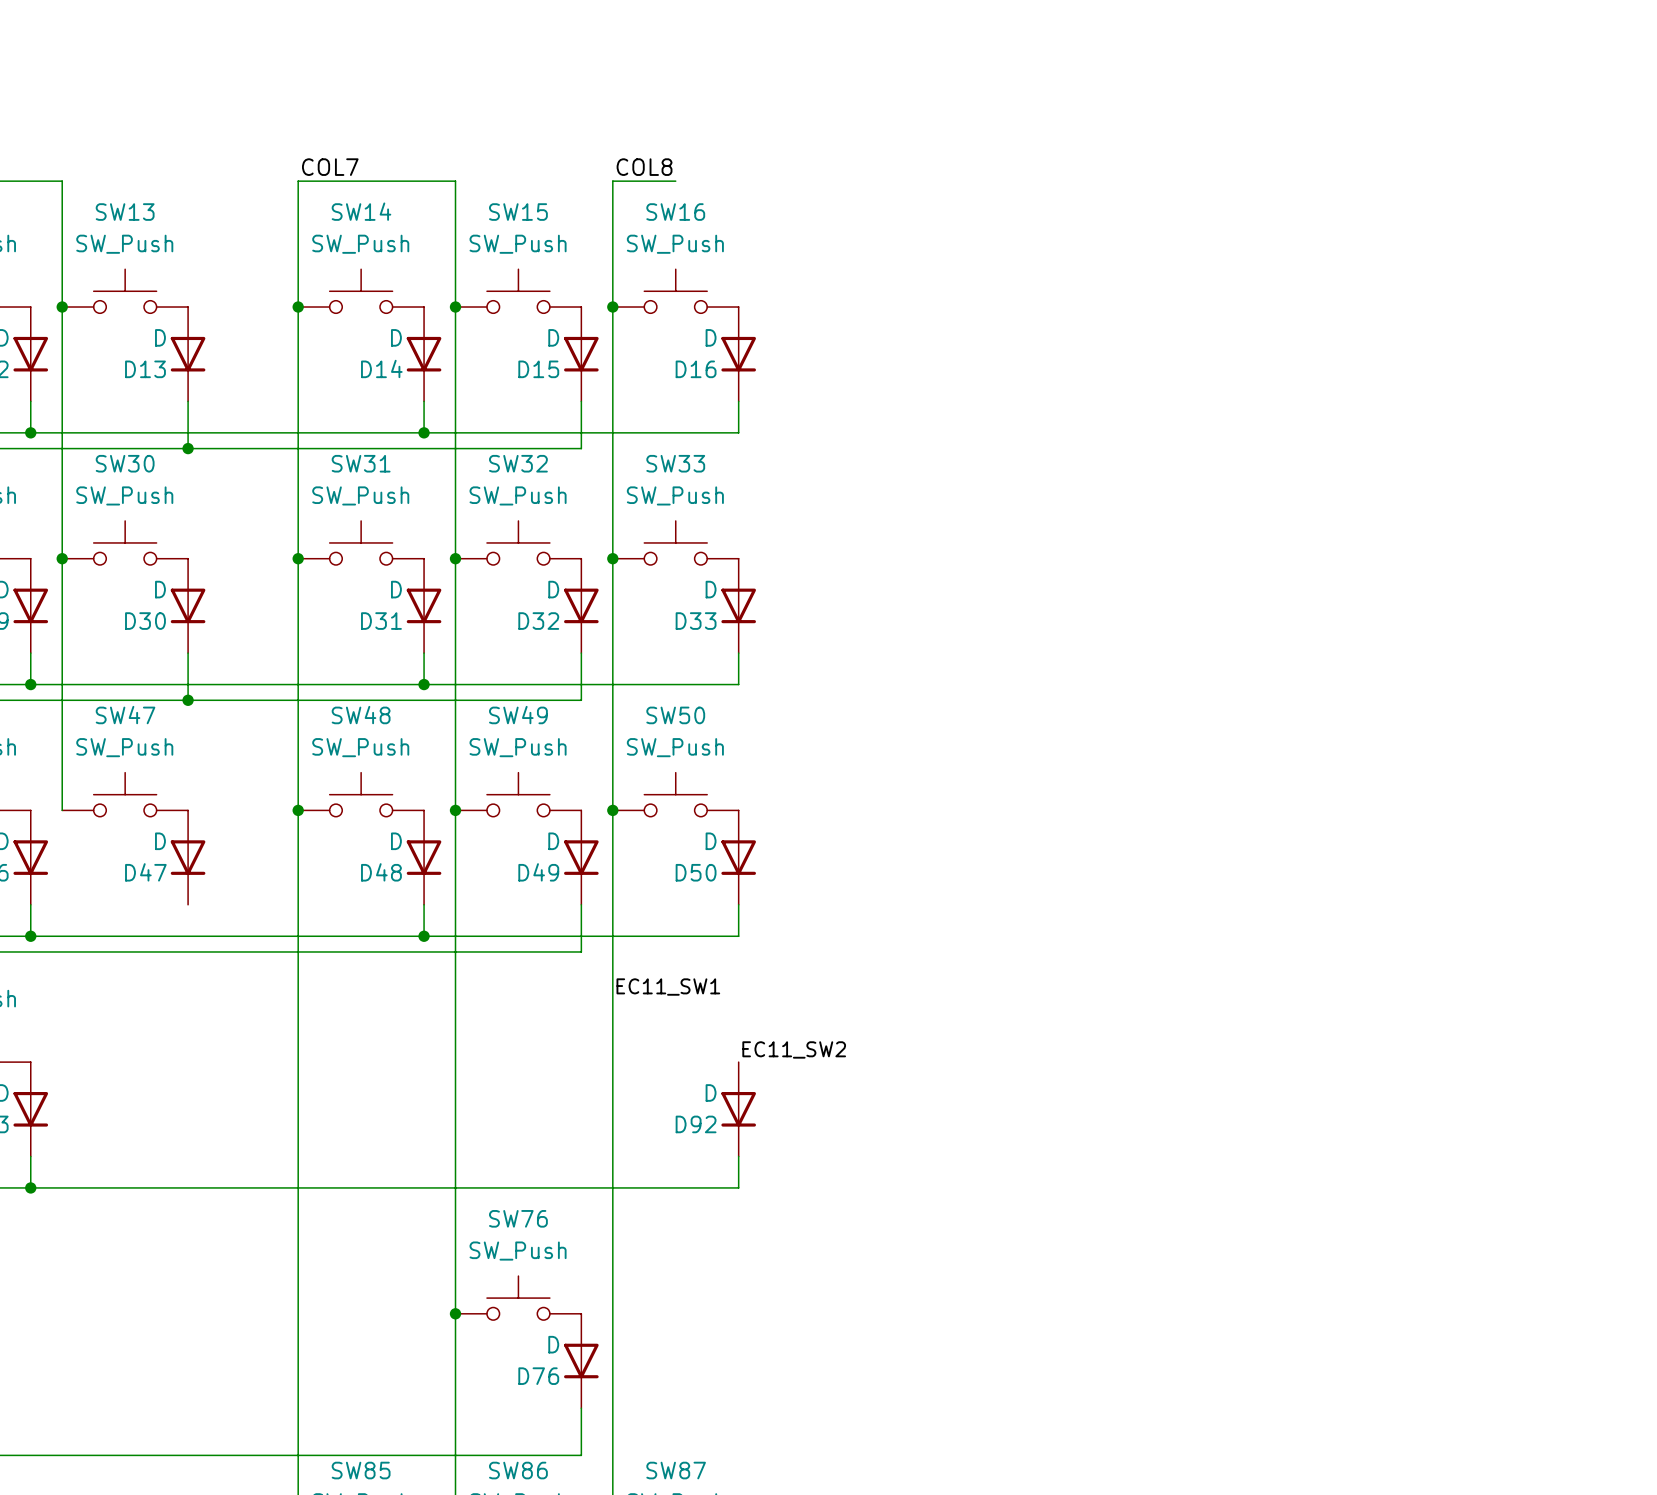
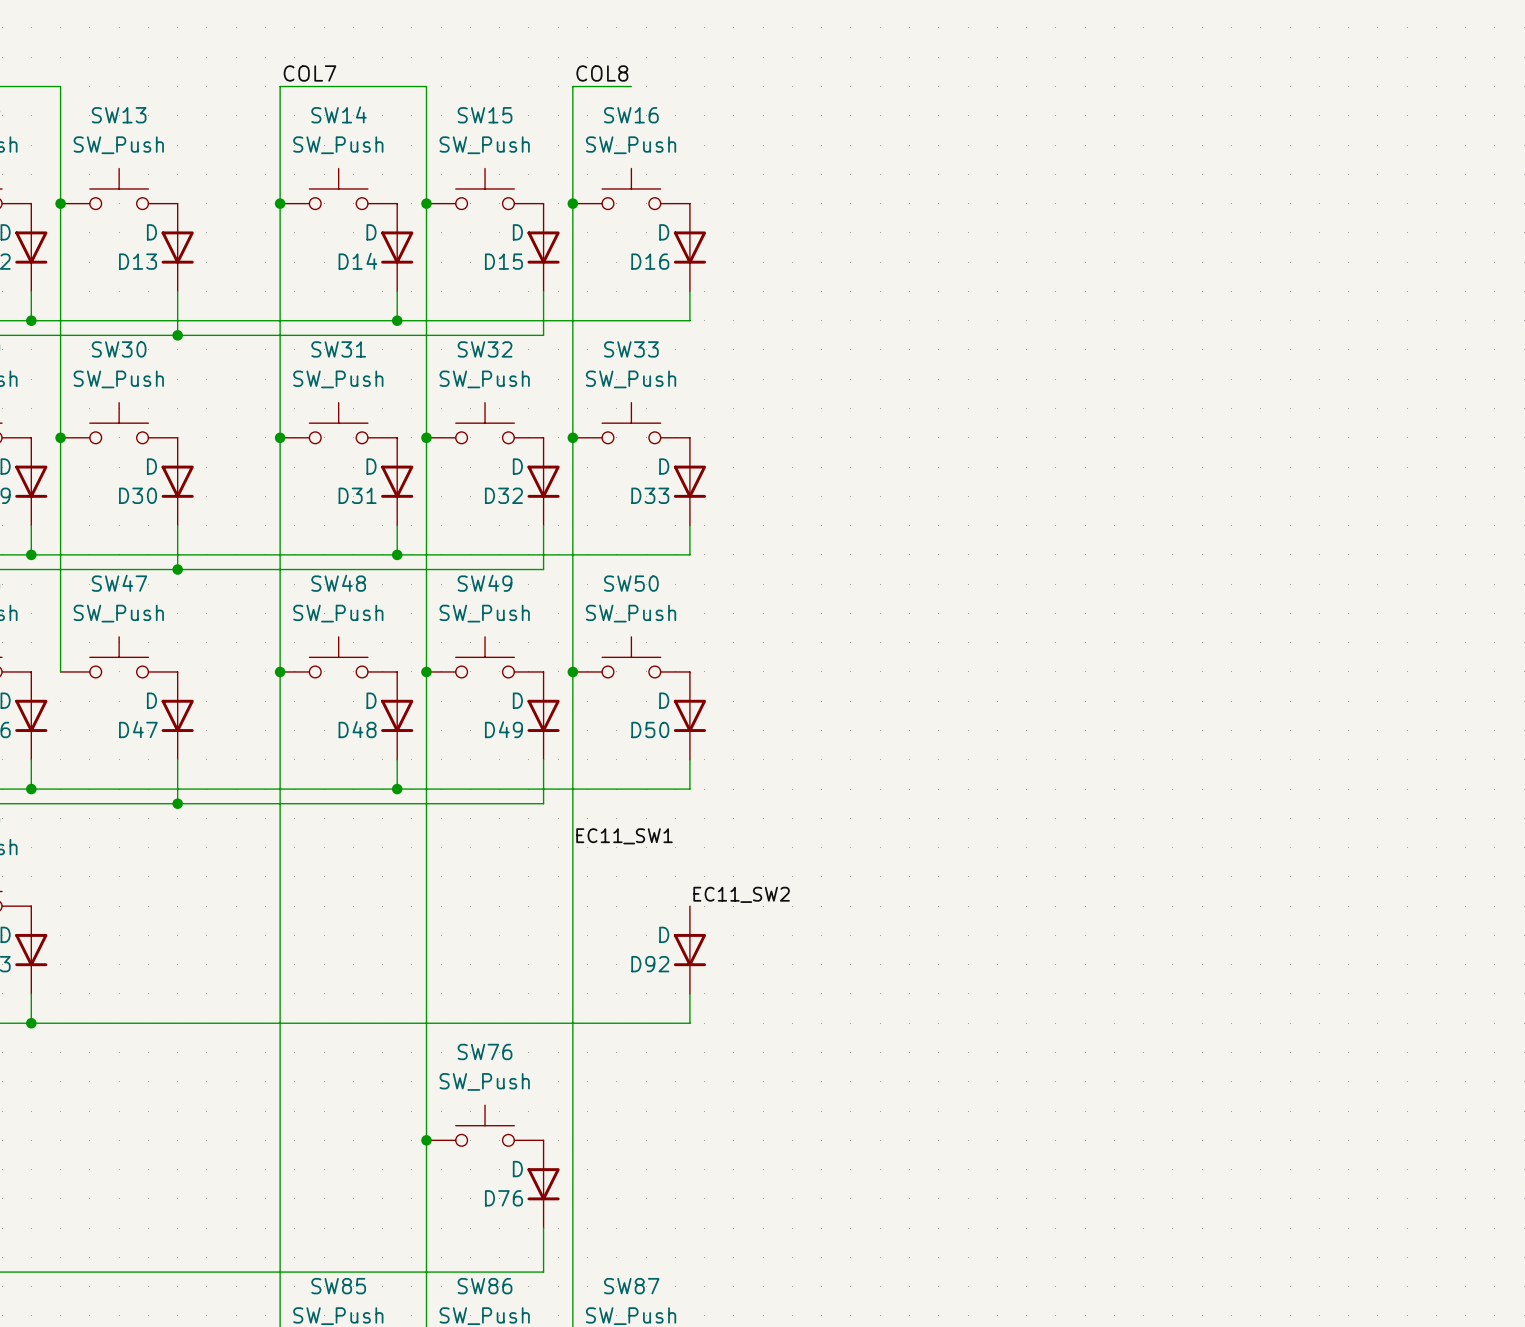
wire: none -> (177, 759) (177, 803)
junction: none -> (177, 803)

